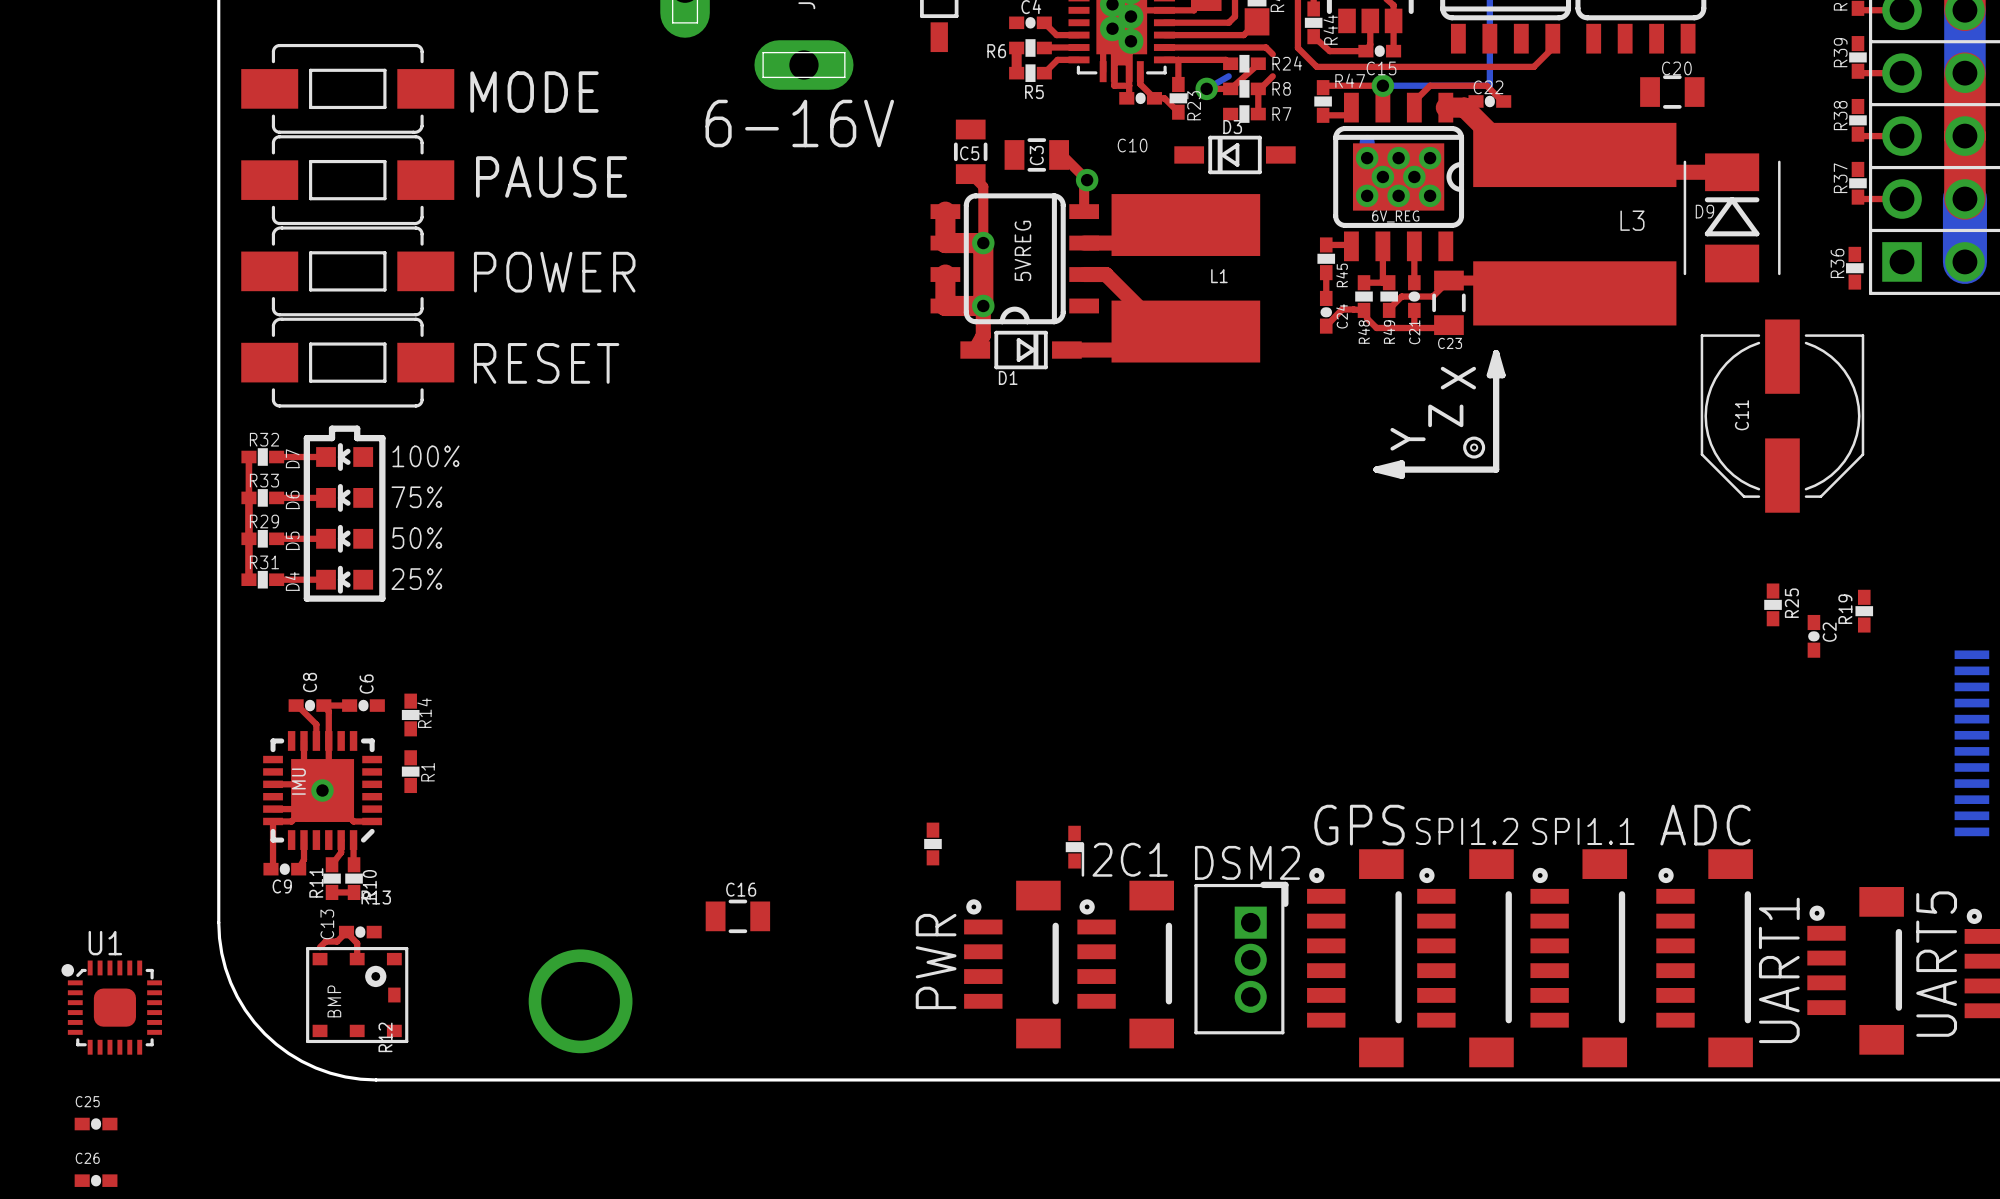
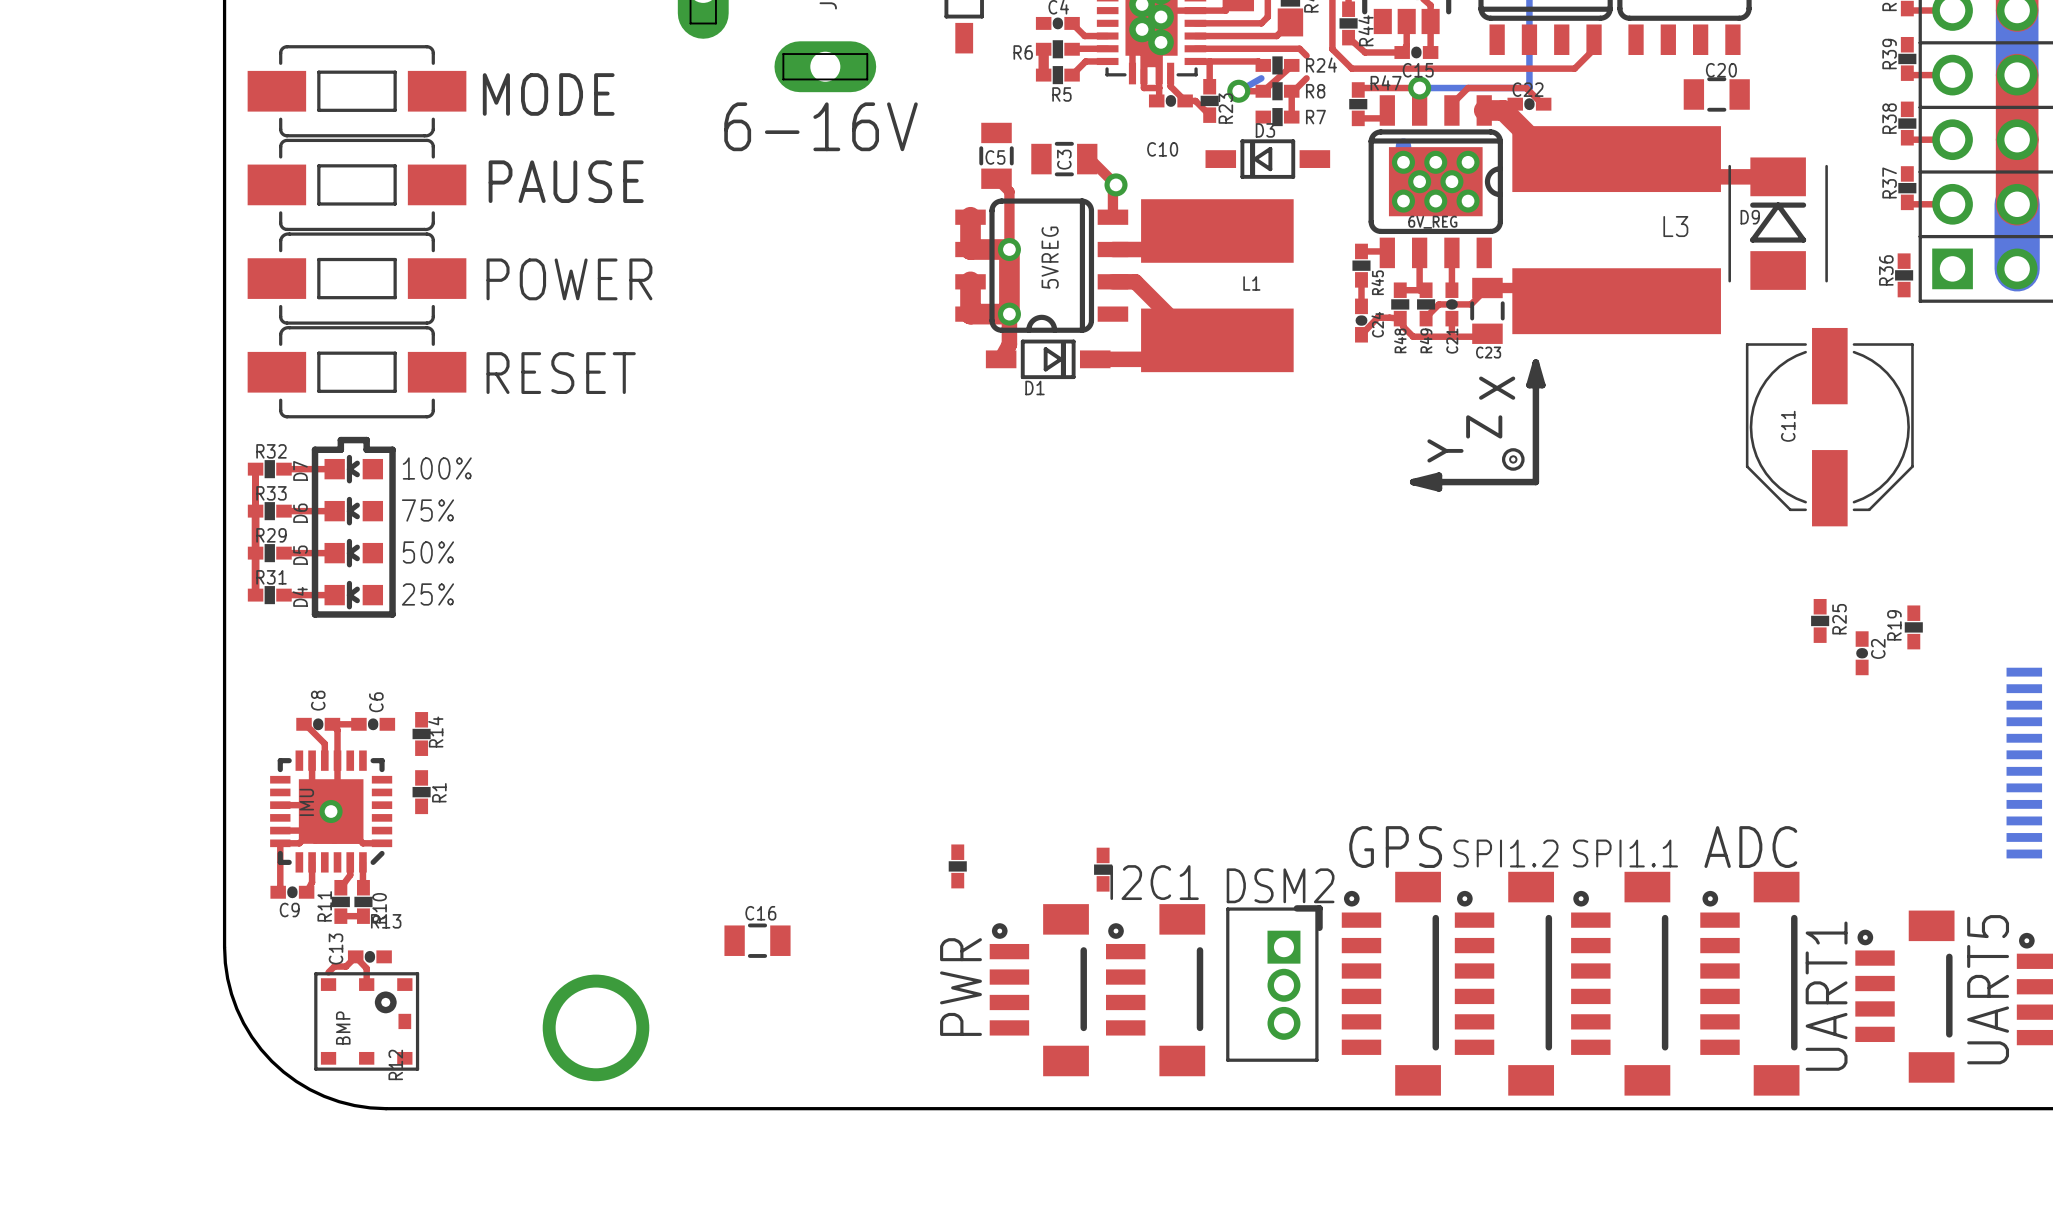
U1: (111, 1007) -> none
C25: (96, 1124) -> none
C26: (96, 1180) -> none

